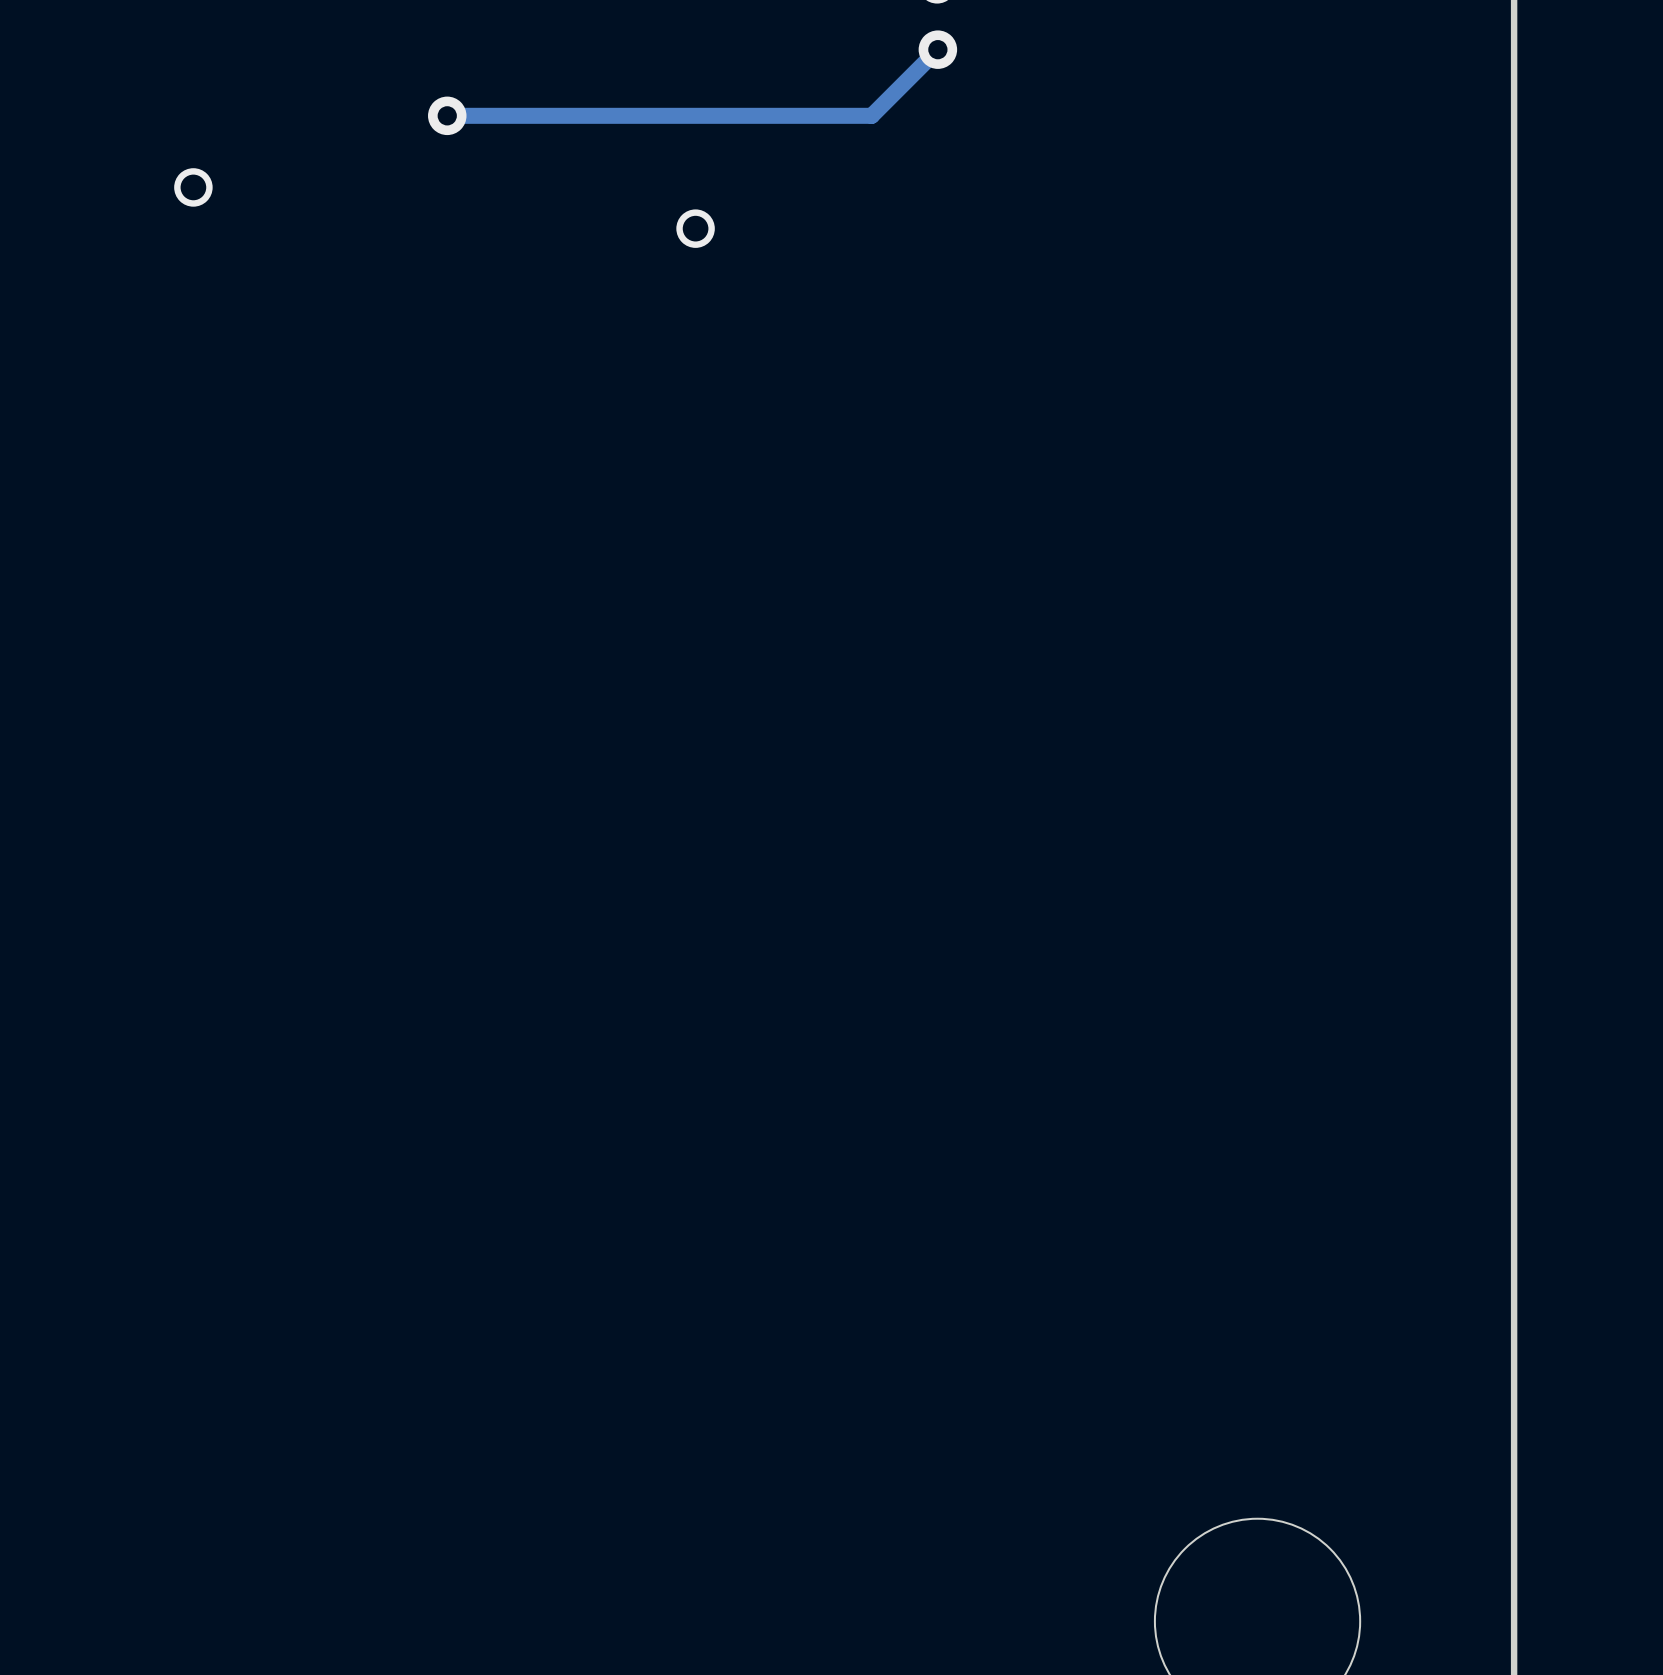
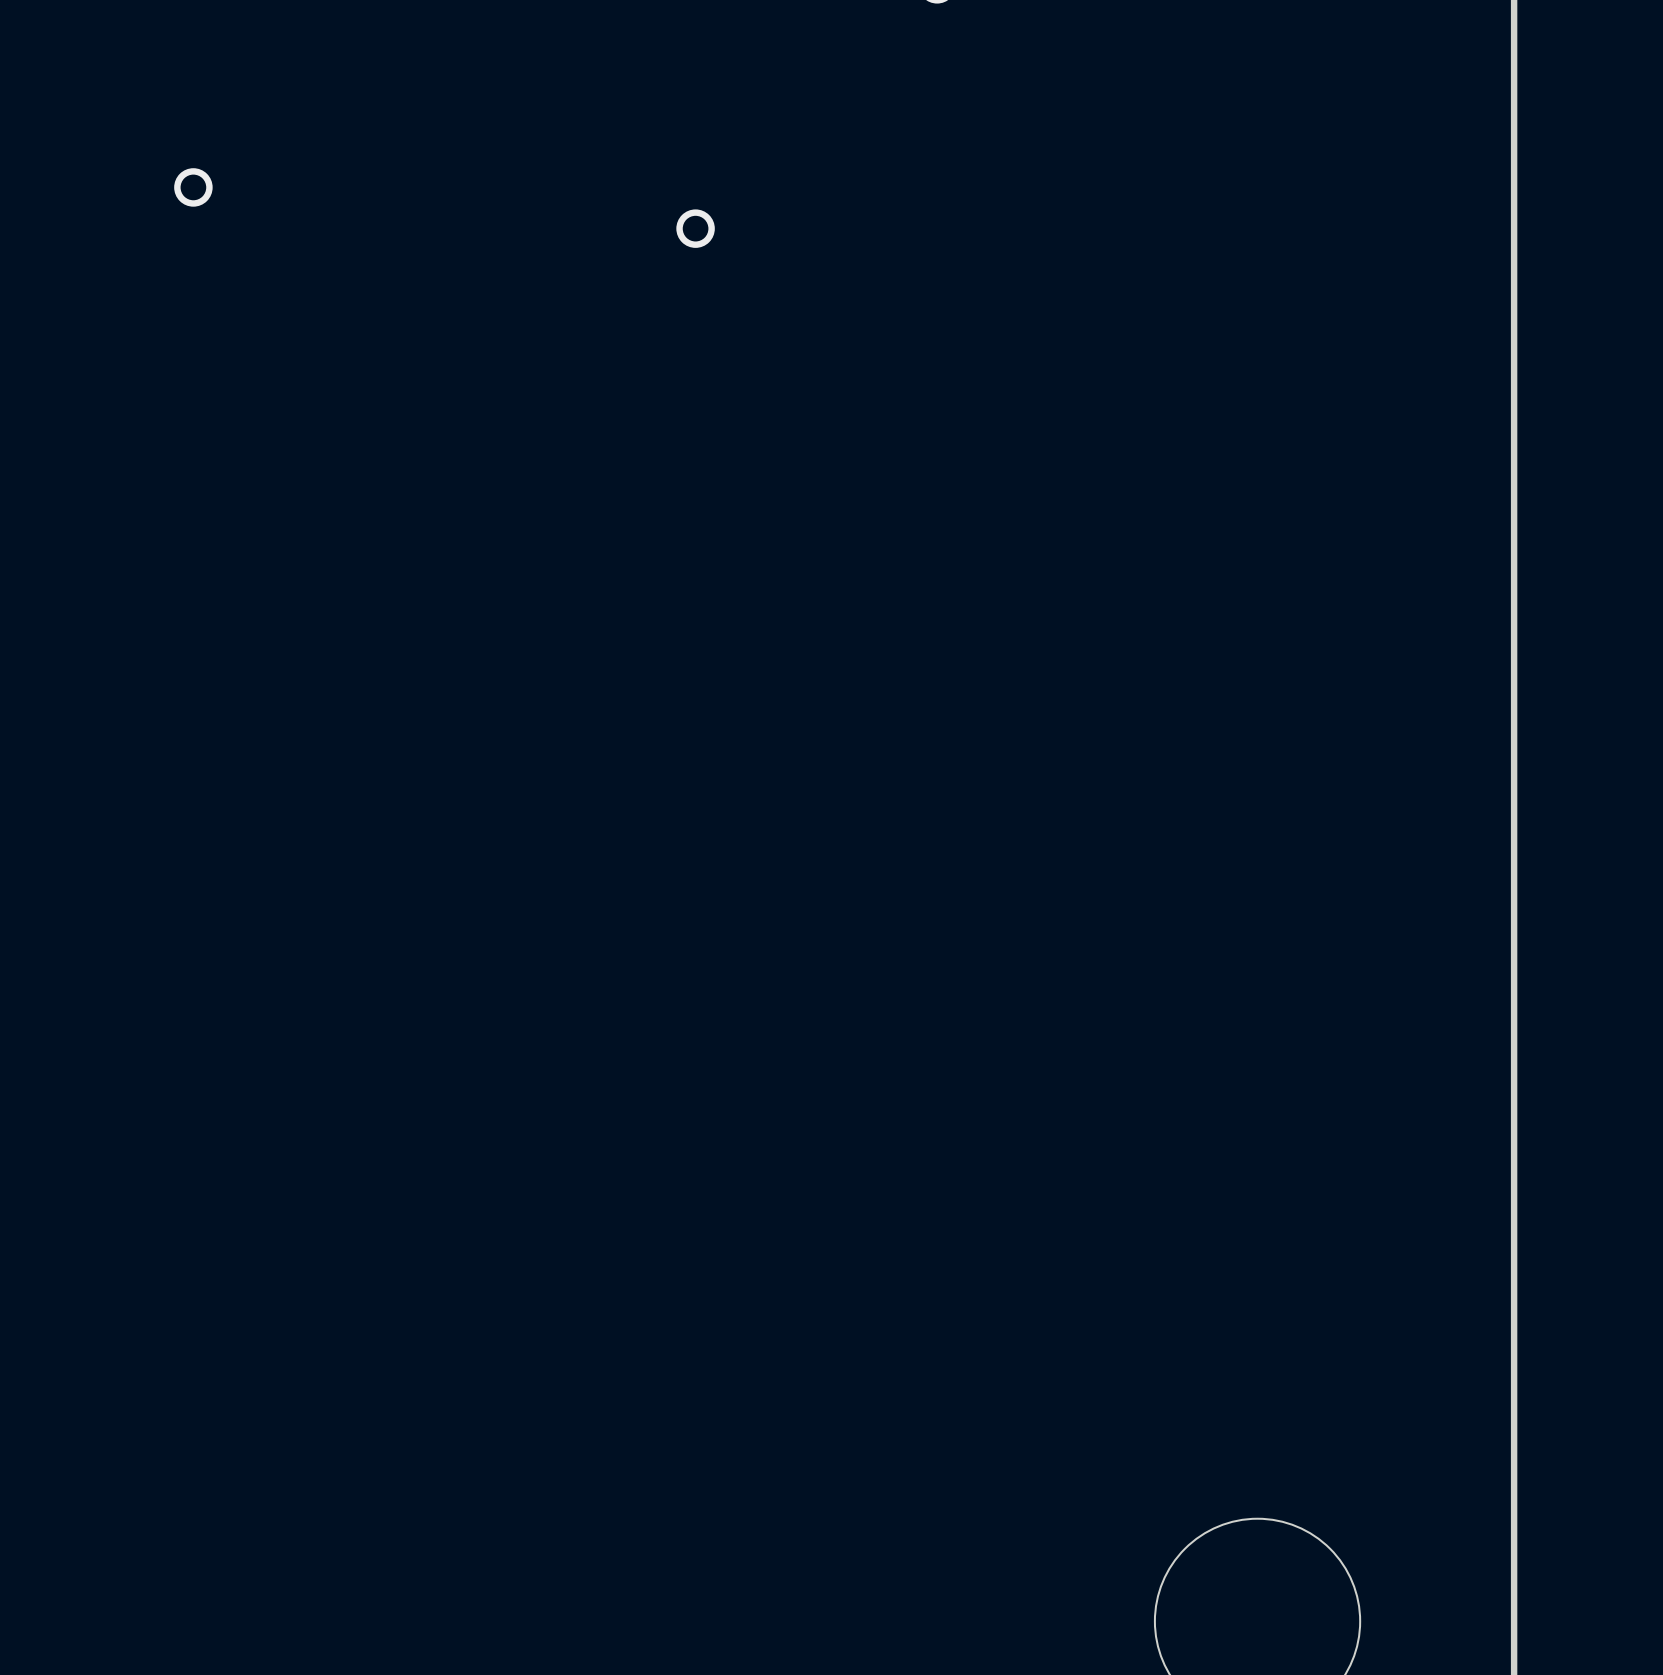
track: (937, 49) (871, 115) (447, 115) -> none
via: (937, 49) -> none
via: (447, 115) -> none

